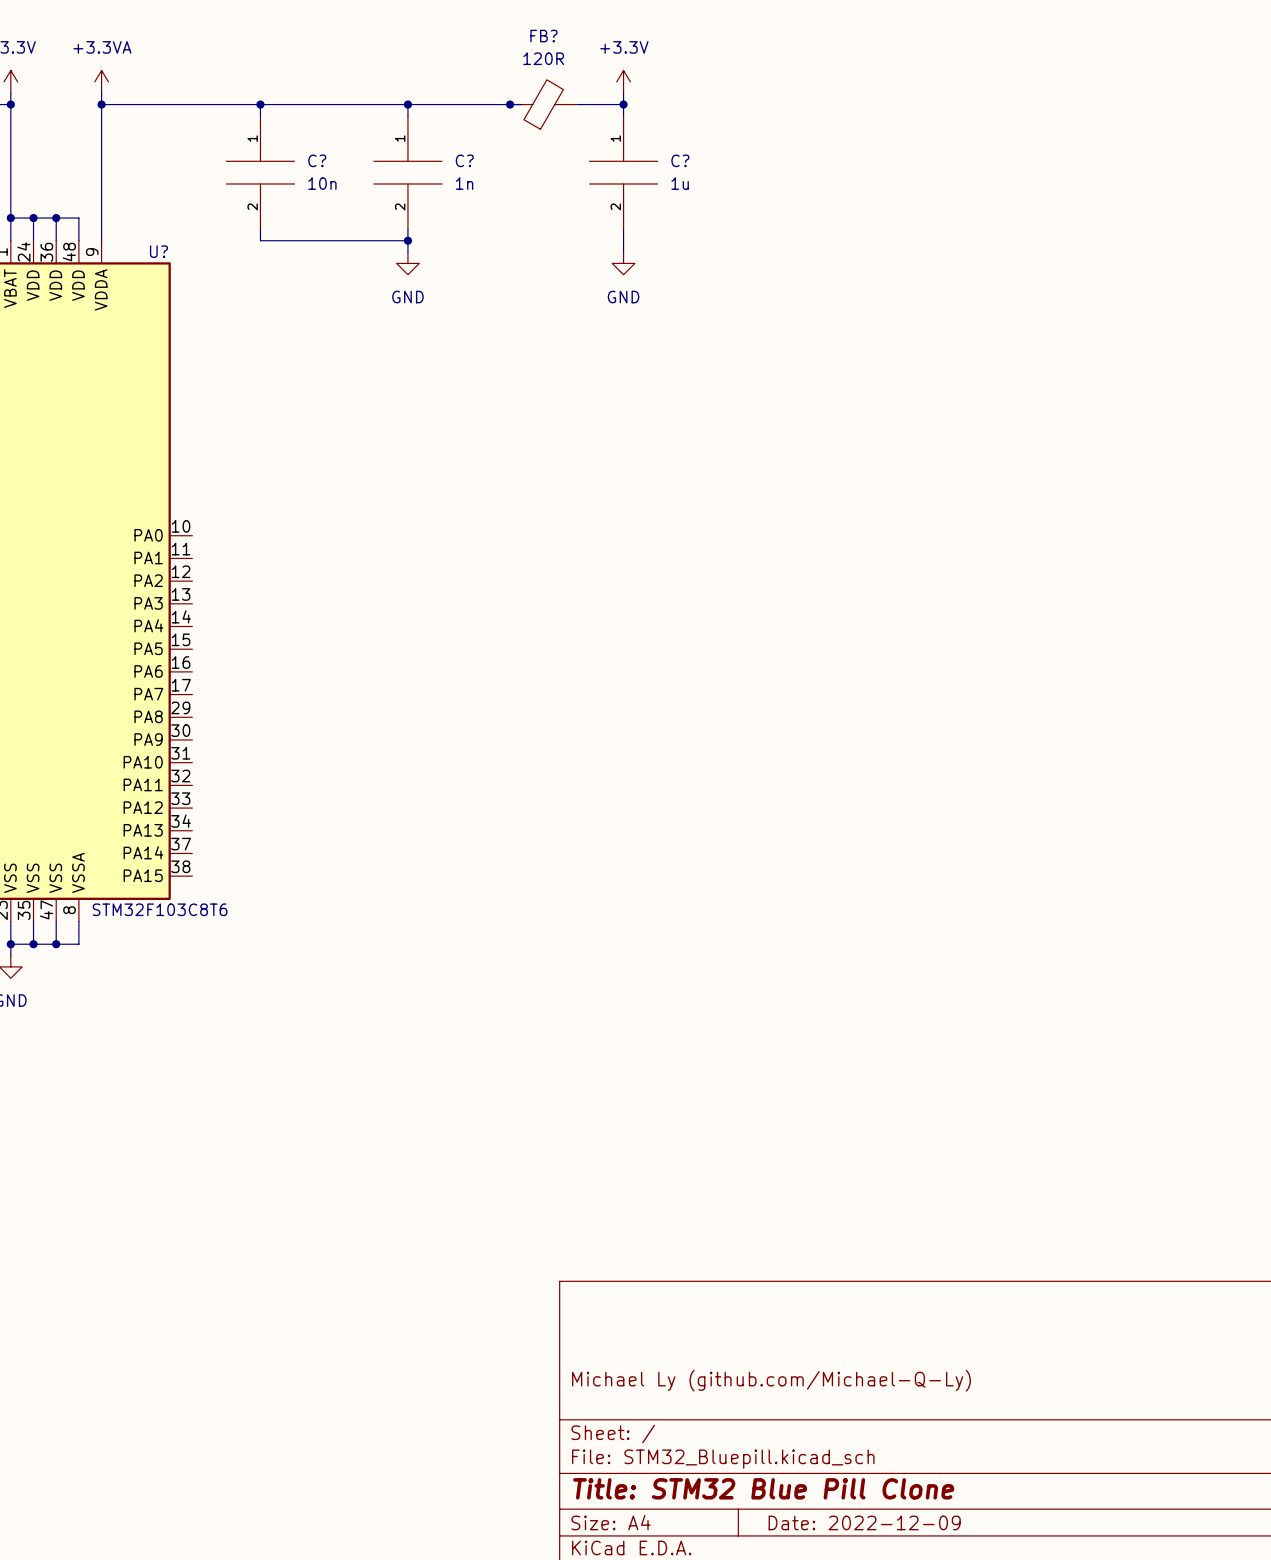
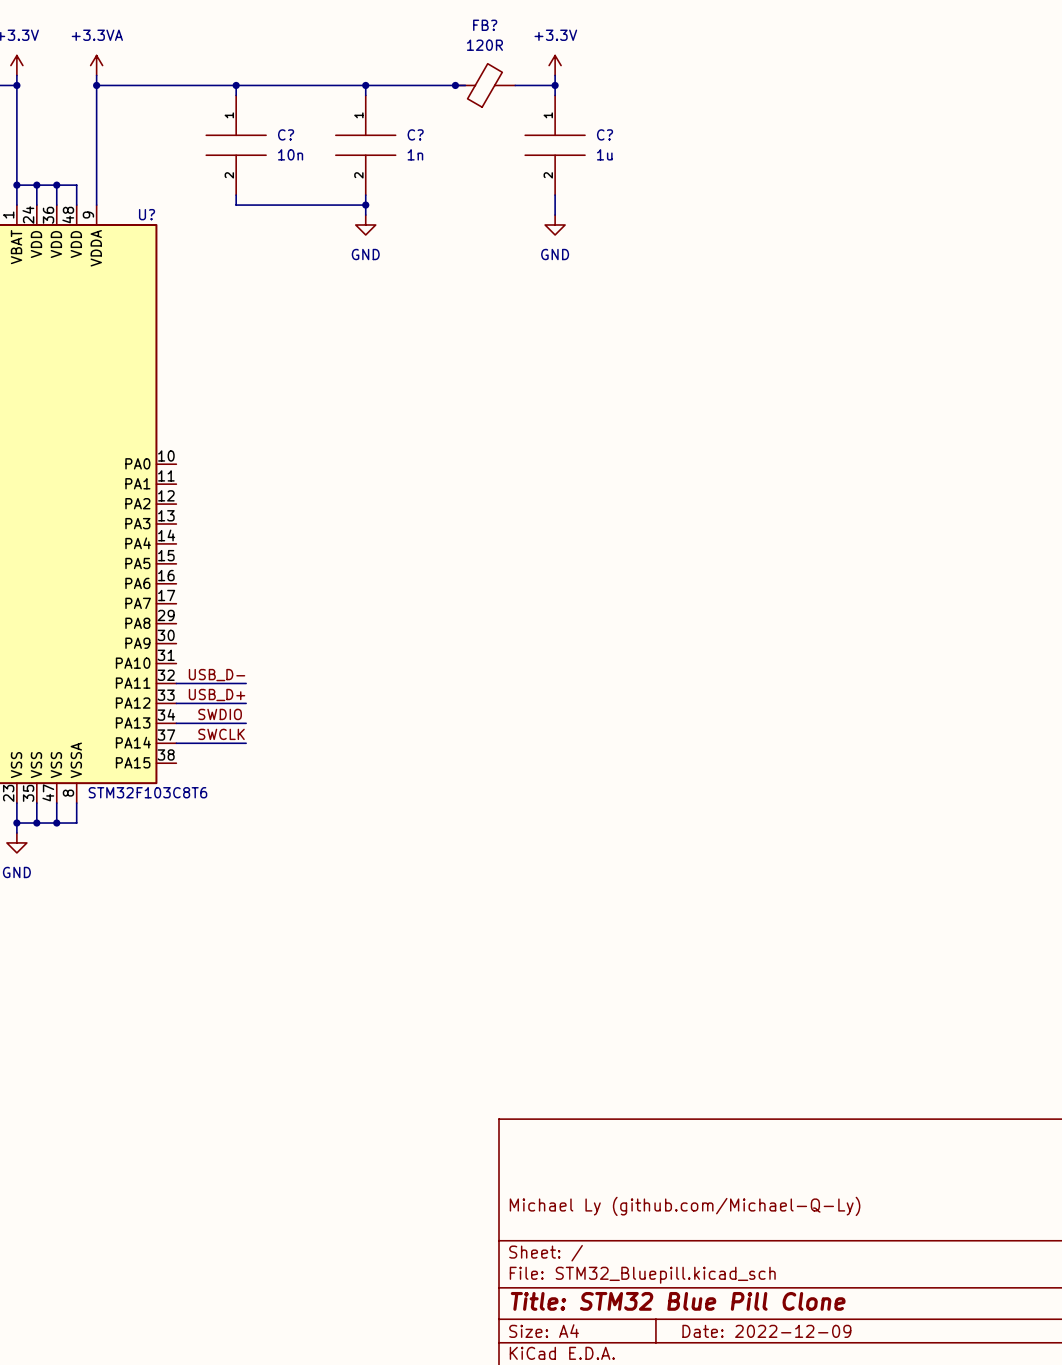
label: none -> USB_D- (217, 675)
wire: none -> (176, 683) (246, 683)
label: none -> USB_D+ (217, 694)
wire: none -> (176, 703) (246, 703)
label: none -> SWDIO (220, 714)
wire: none -> (176, 723) (246, 723)
label: none -> SWCLK (221, 734)
wire: none -> (176, 743) (246, 743)

